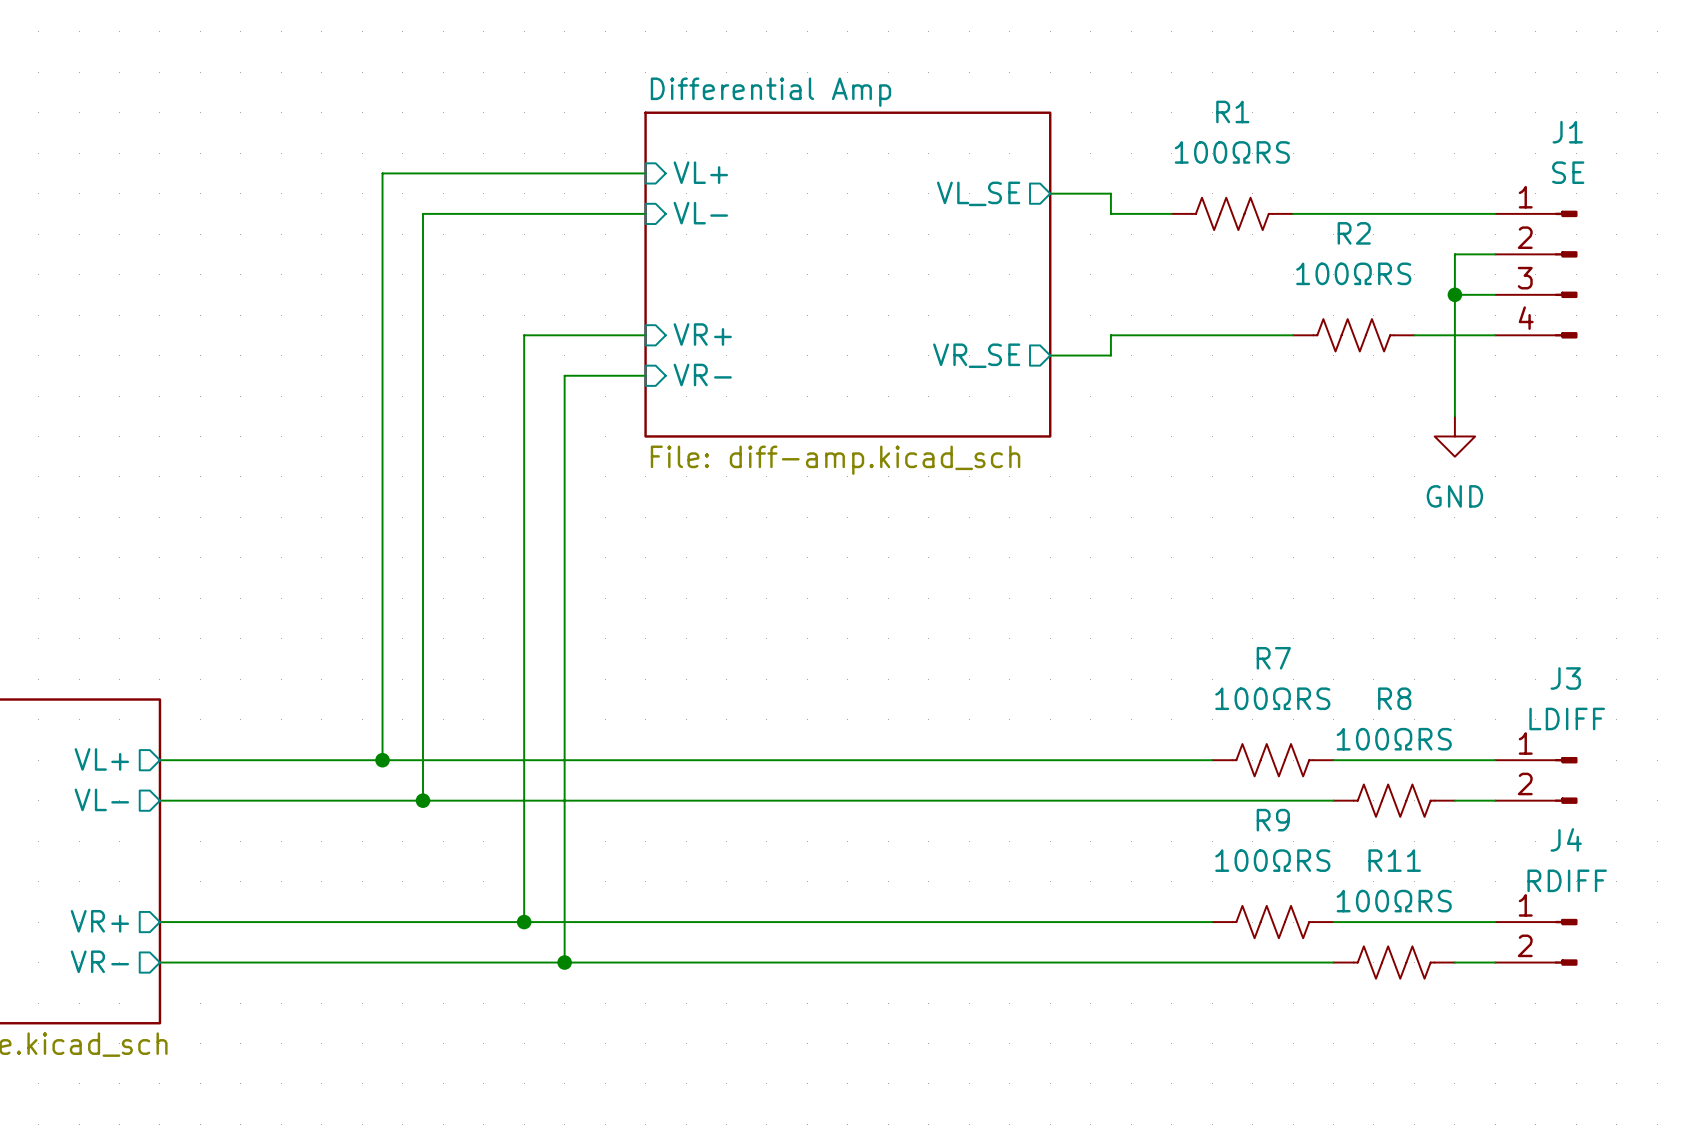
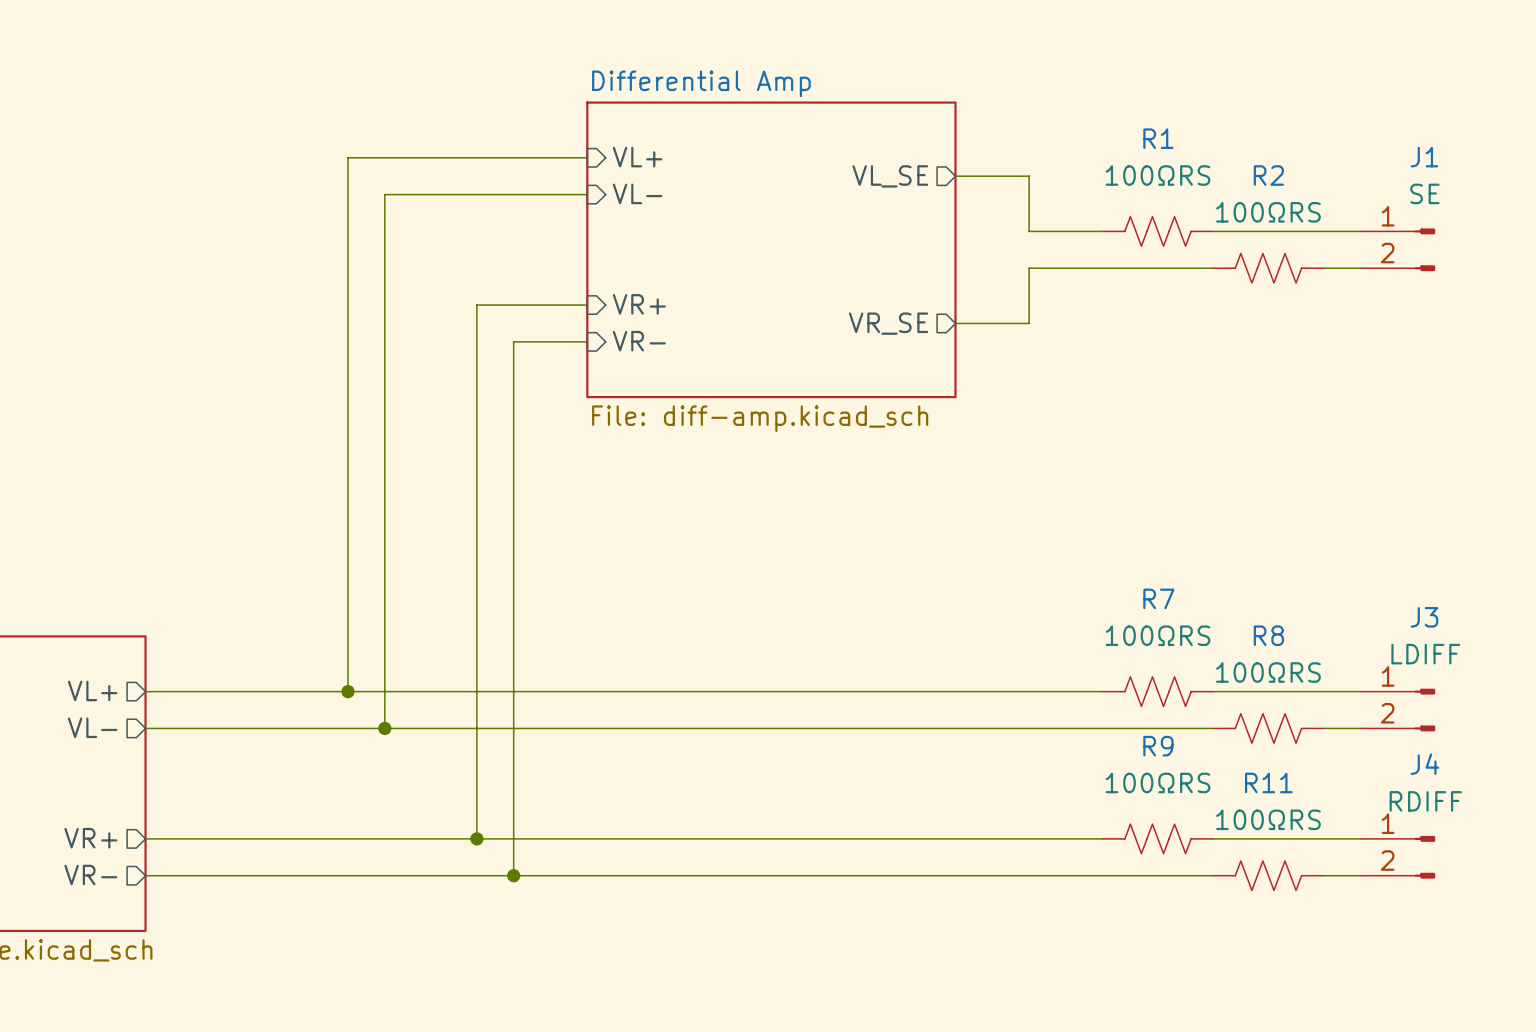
J1 name position: J1 (1567, 132) -> J1 (1424, 157)
J1 value position: SE (1568, 172) -> SE (1424, 193)
wire: (1110, 193) (1110, 213) (1171, 213) -> (1010, 176) (1029, 176) (1029, 231) (1102, 231)
J1 symbol: [1495, 210, 1578, 339] -> [1360, 228, 1436, 272]
R1 position: (1232, 213) -> (1157, 231)
wire: (1293, 213) (1495, 213) -> none
wire: (1454, 254) (1454, 416) -> (1323, 231) (1213, 231)
junction: (1454, 294) -> none
wire: (1293, 335) (1110, 335) (1110, 355) -> (1213, 268) (1029, 268) (1029, 323) (1010, 323)
R2 position: (1353, 335) -> (1268, 268)
wire: (1414, 335) (1495, 335) -> none
power symbol: GND (1454, 436) -> none

